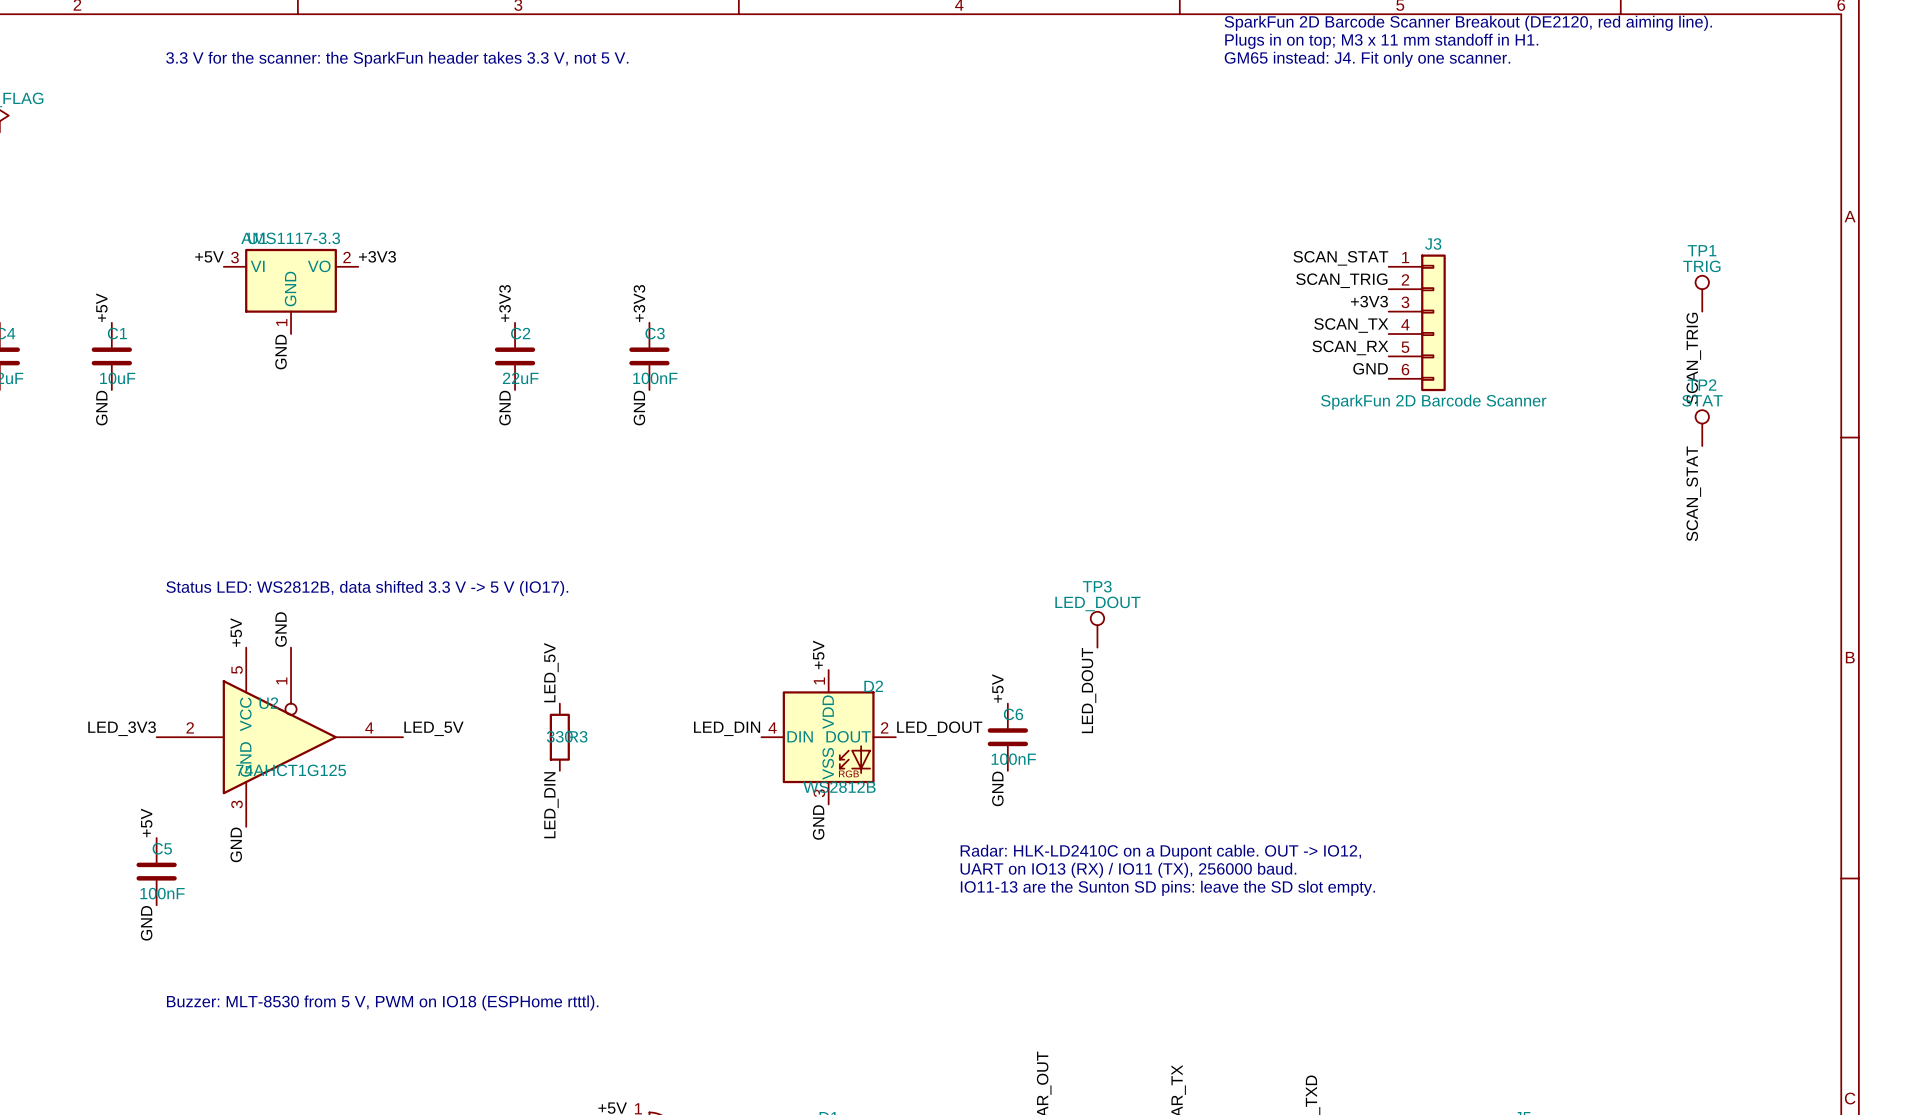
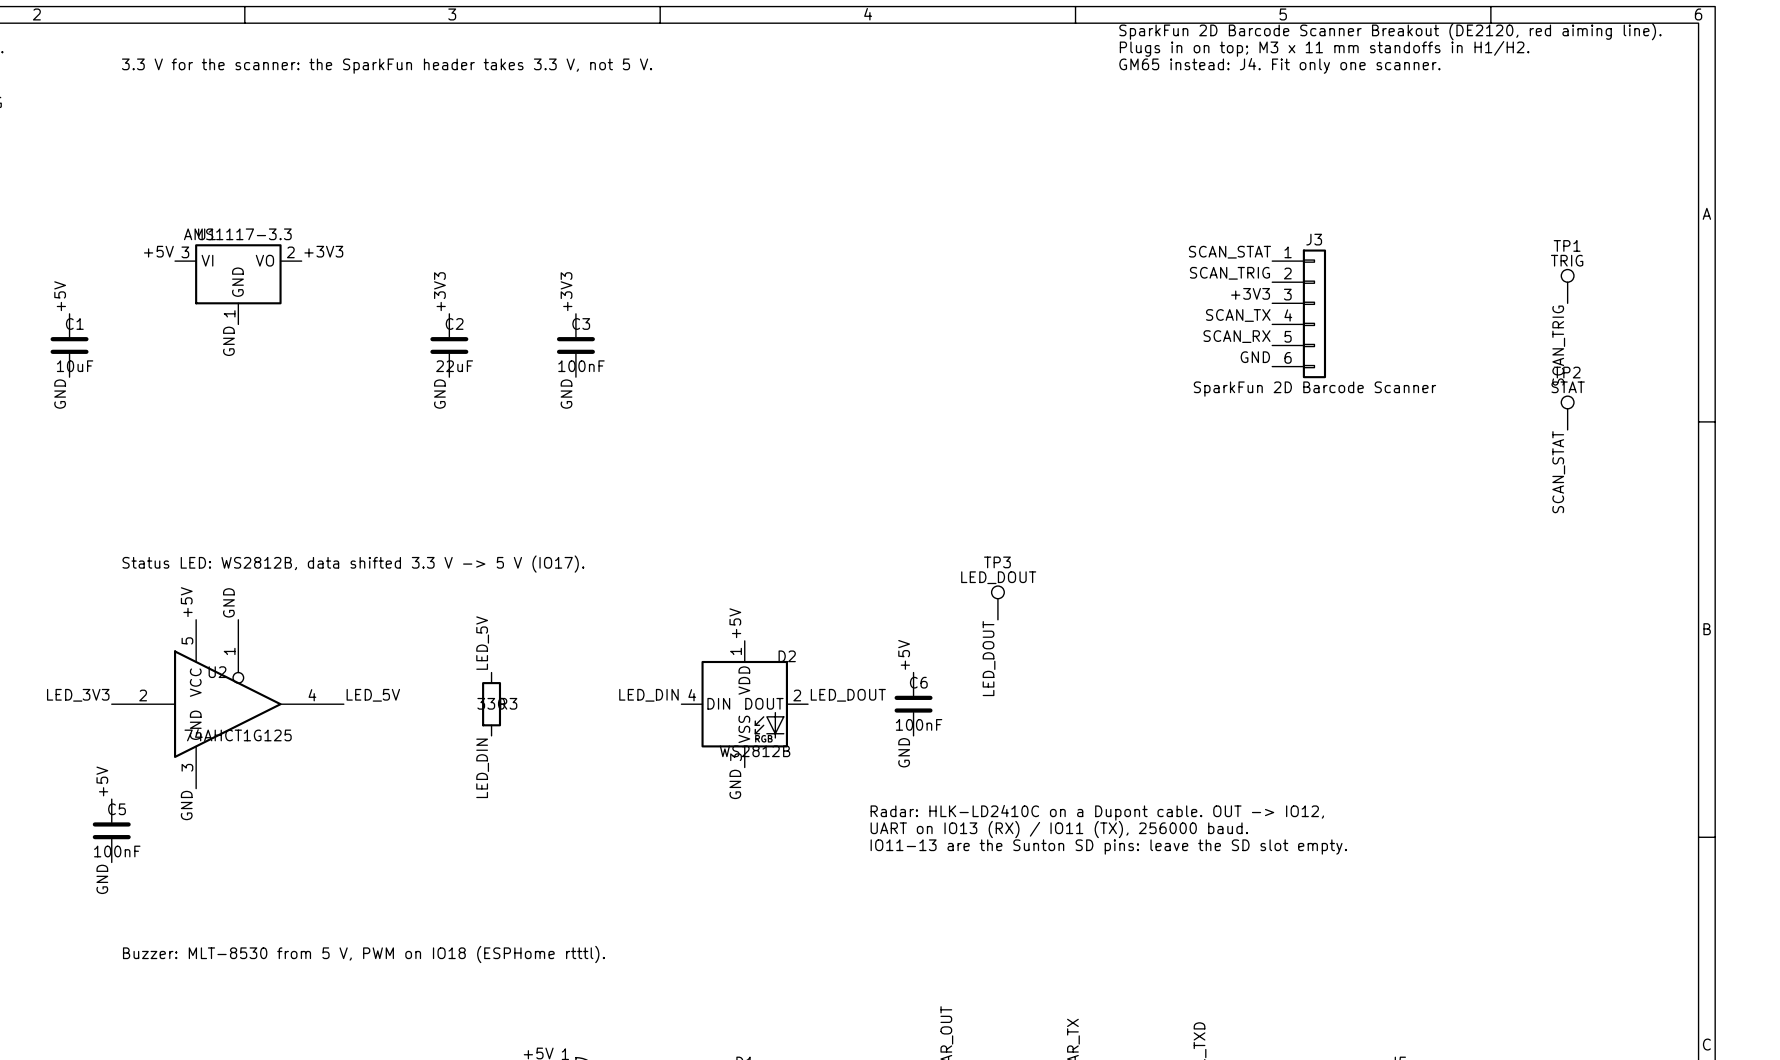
text: Plugs in on top; M3 x 11 mm standoff in H1. (1381, 41) -> Plugs in on top; M3 x 11 mm standoffs in H1/H2. (1324, 48)

